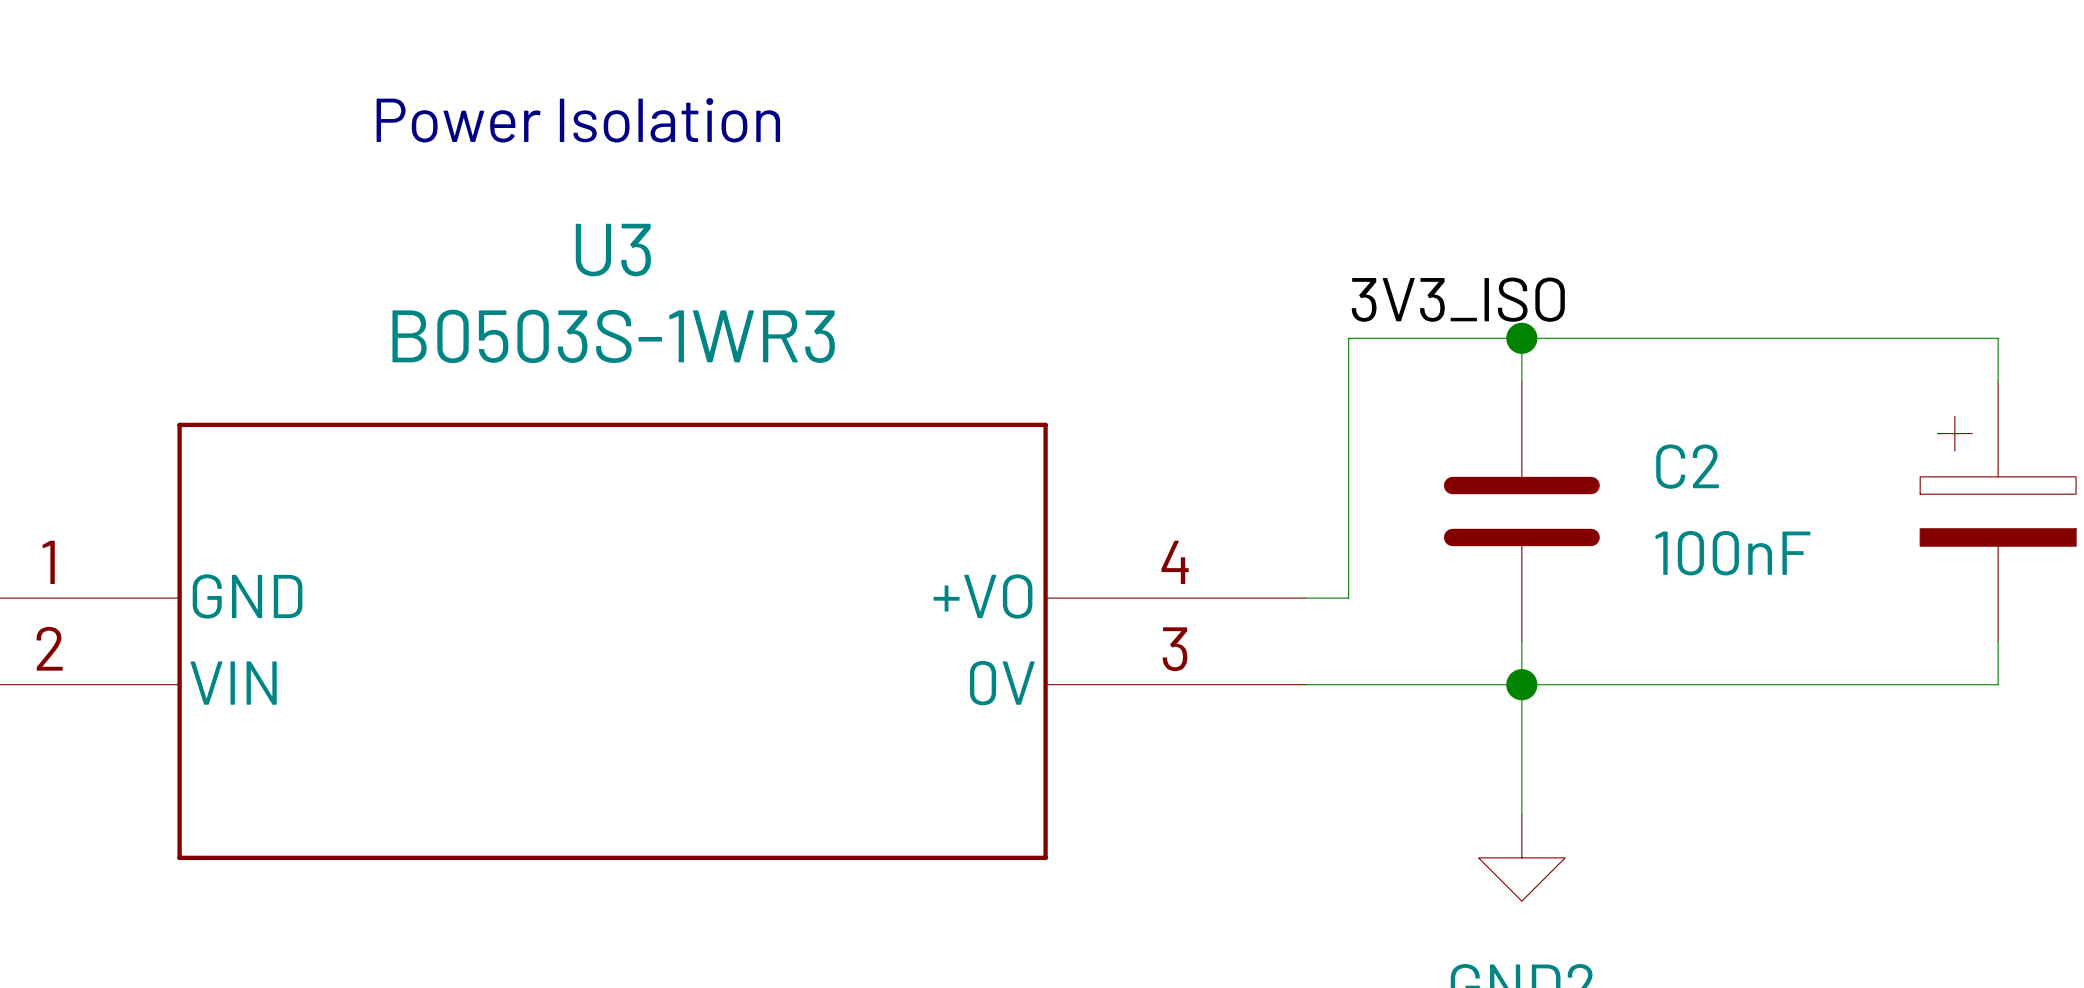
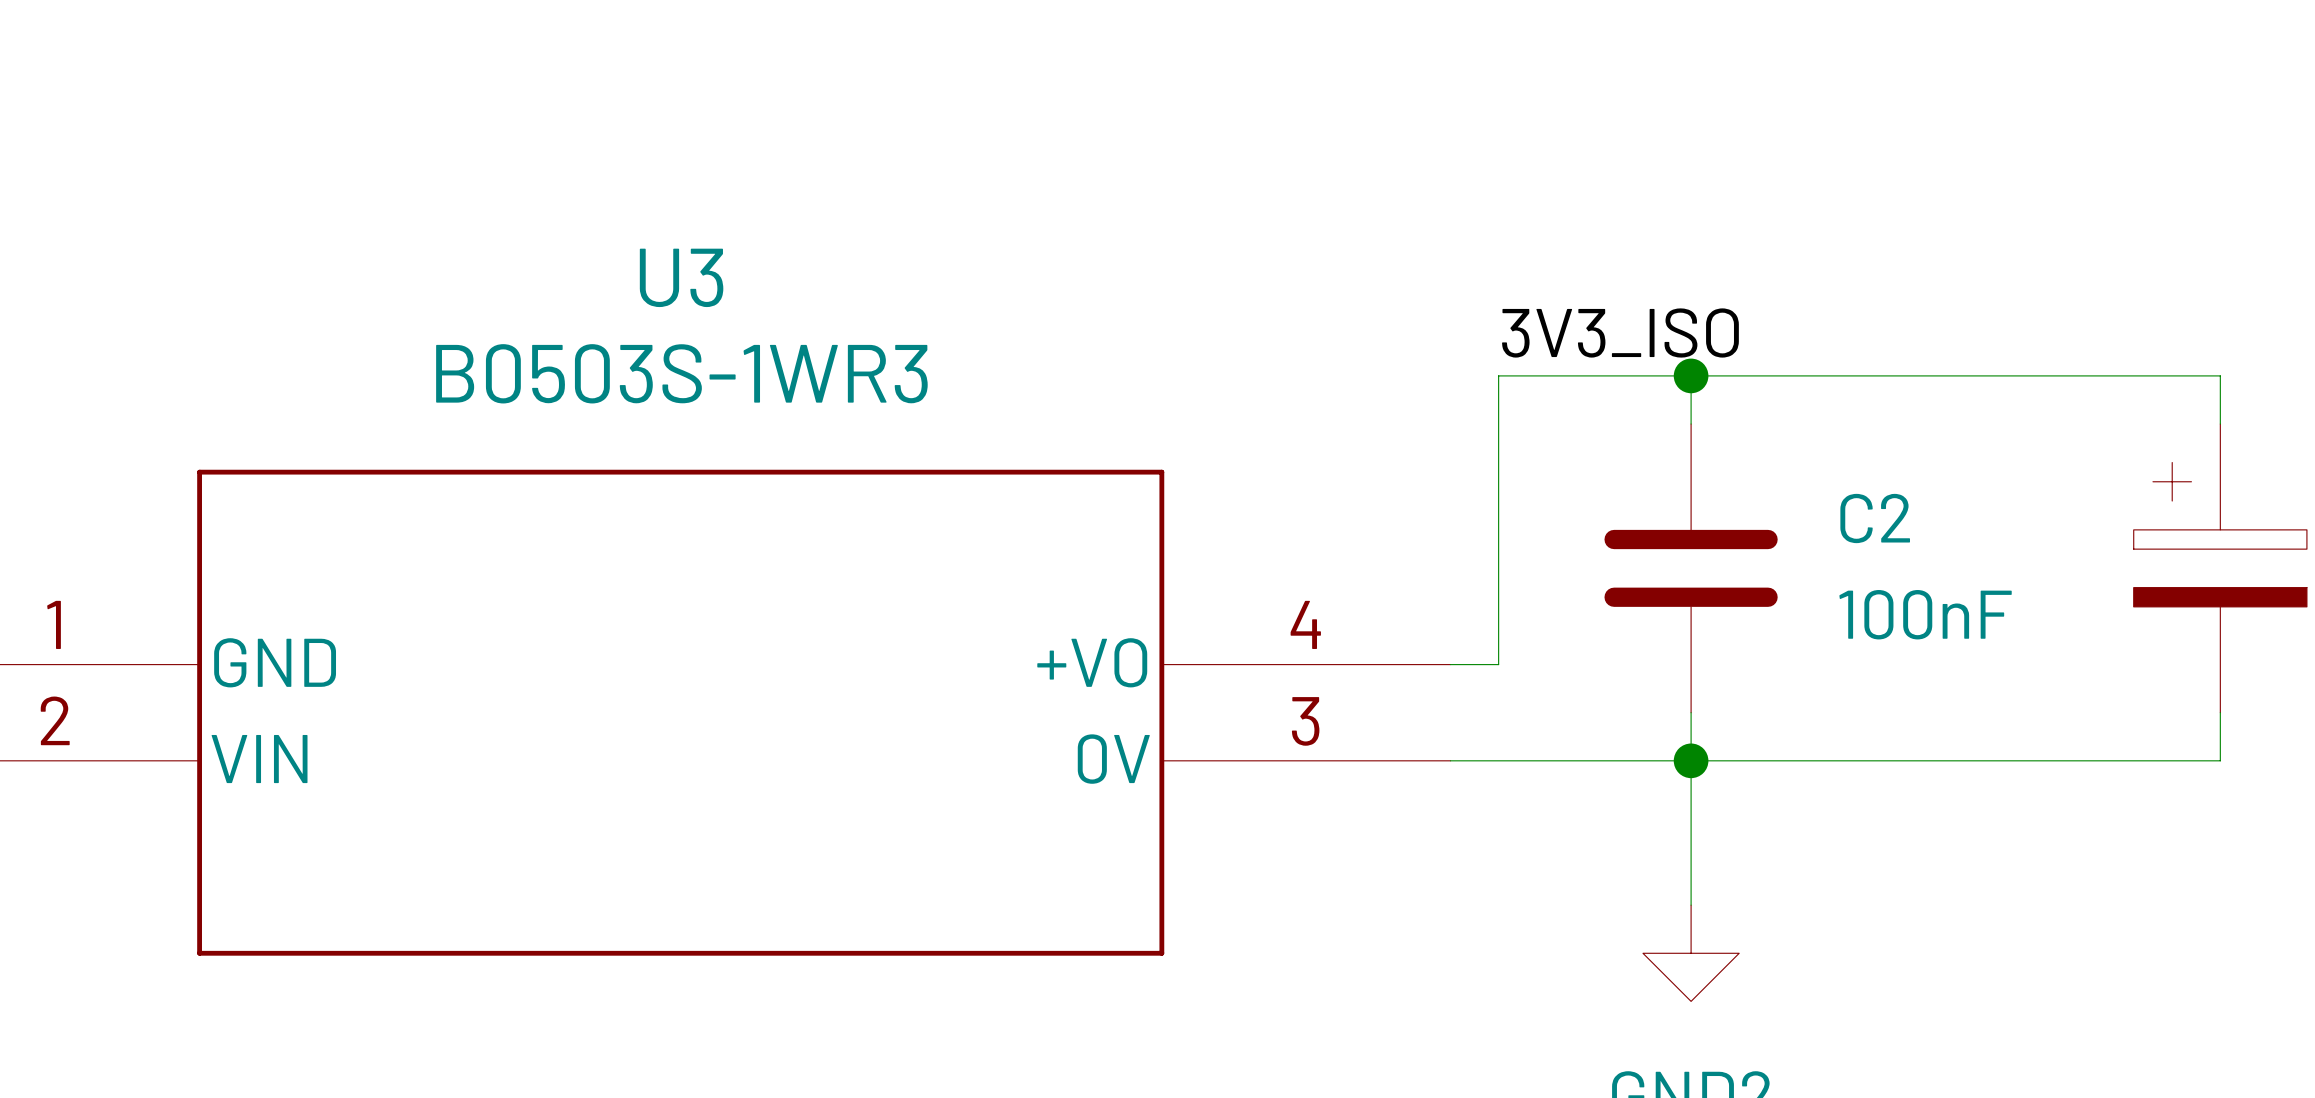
text: Power Isolation (578, 120) -> none

